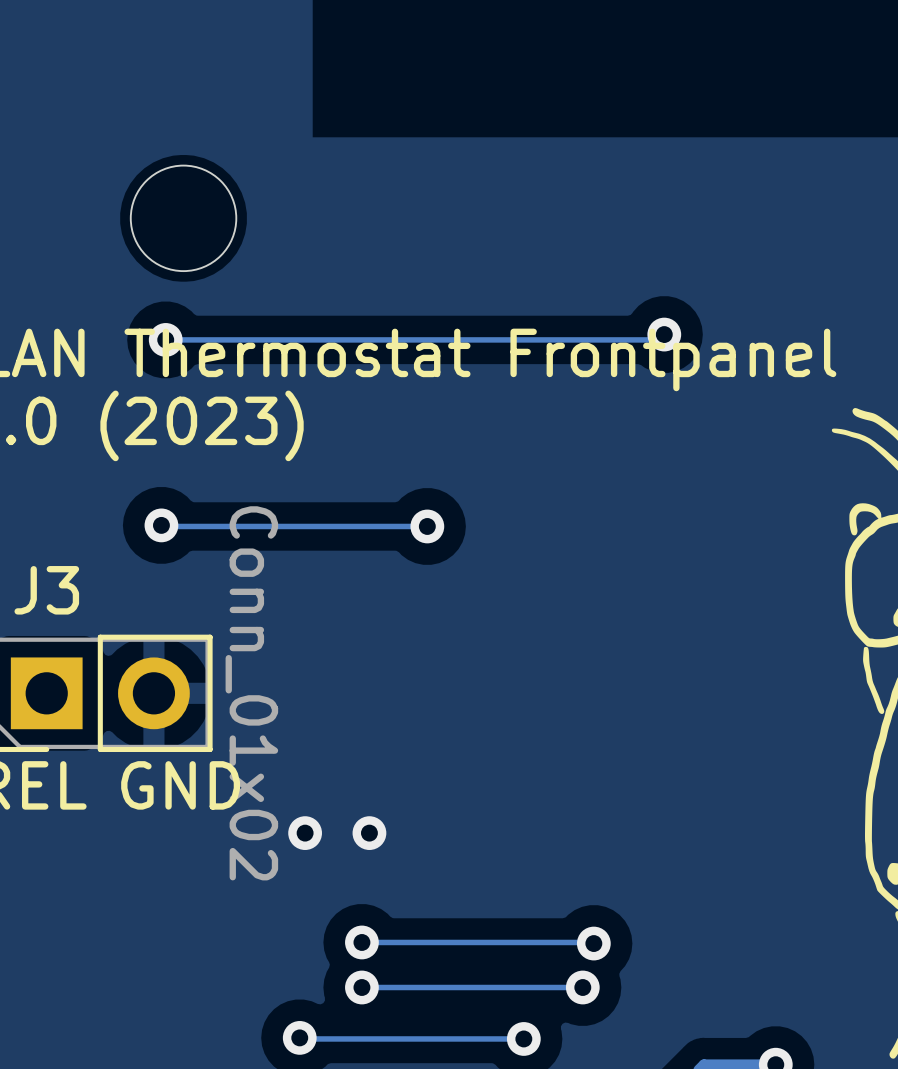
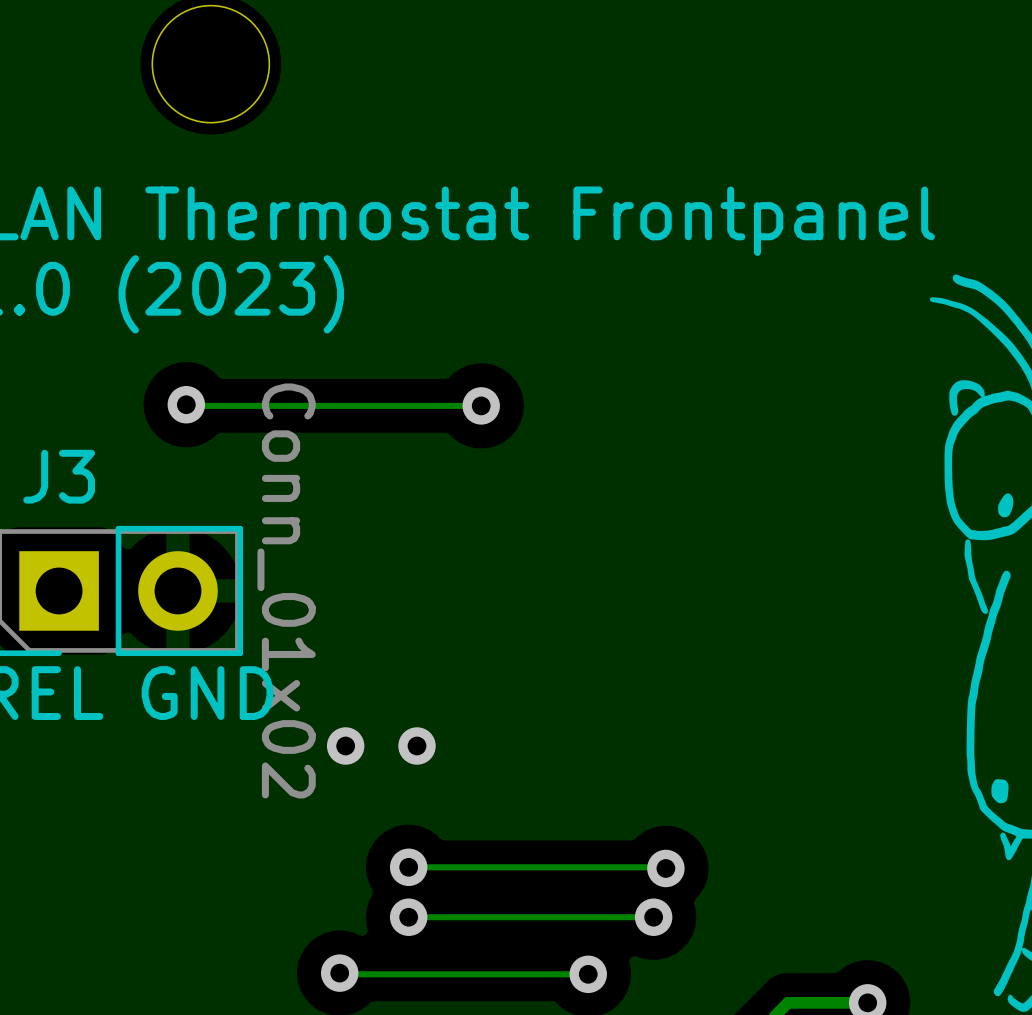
track: (664, 334) (658, 339) (165, 339) -> none
via: (664, 334) -> none
via: (165, 339) -> none

